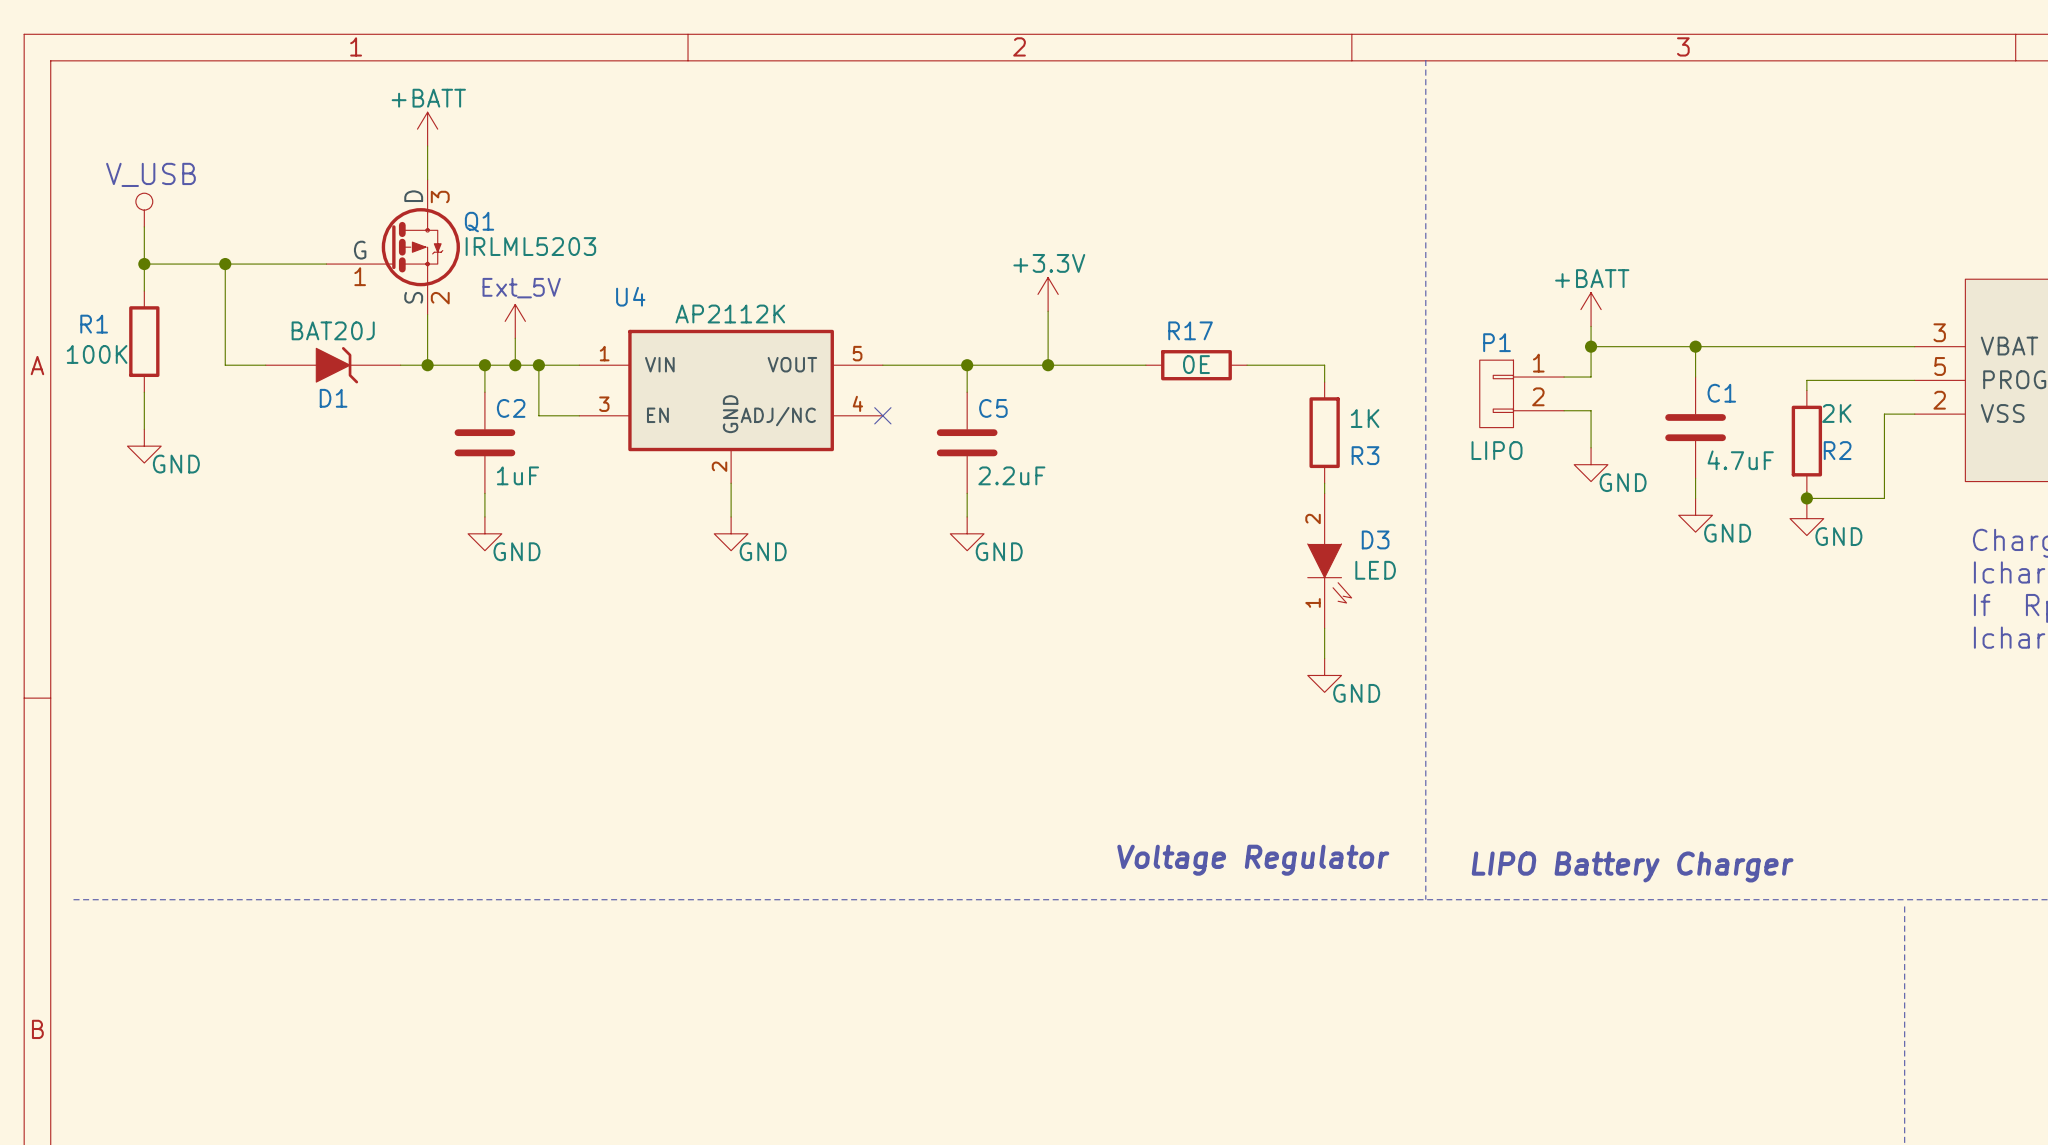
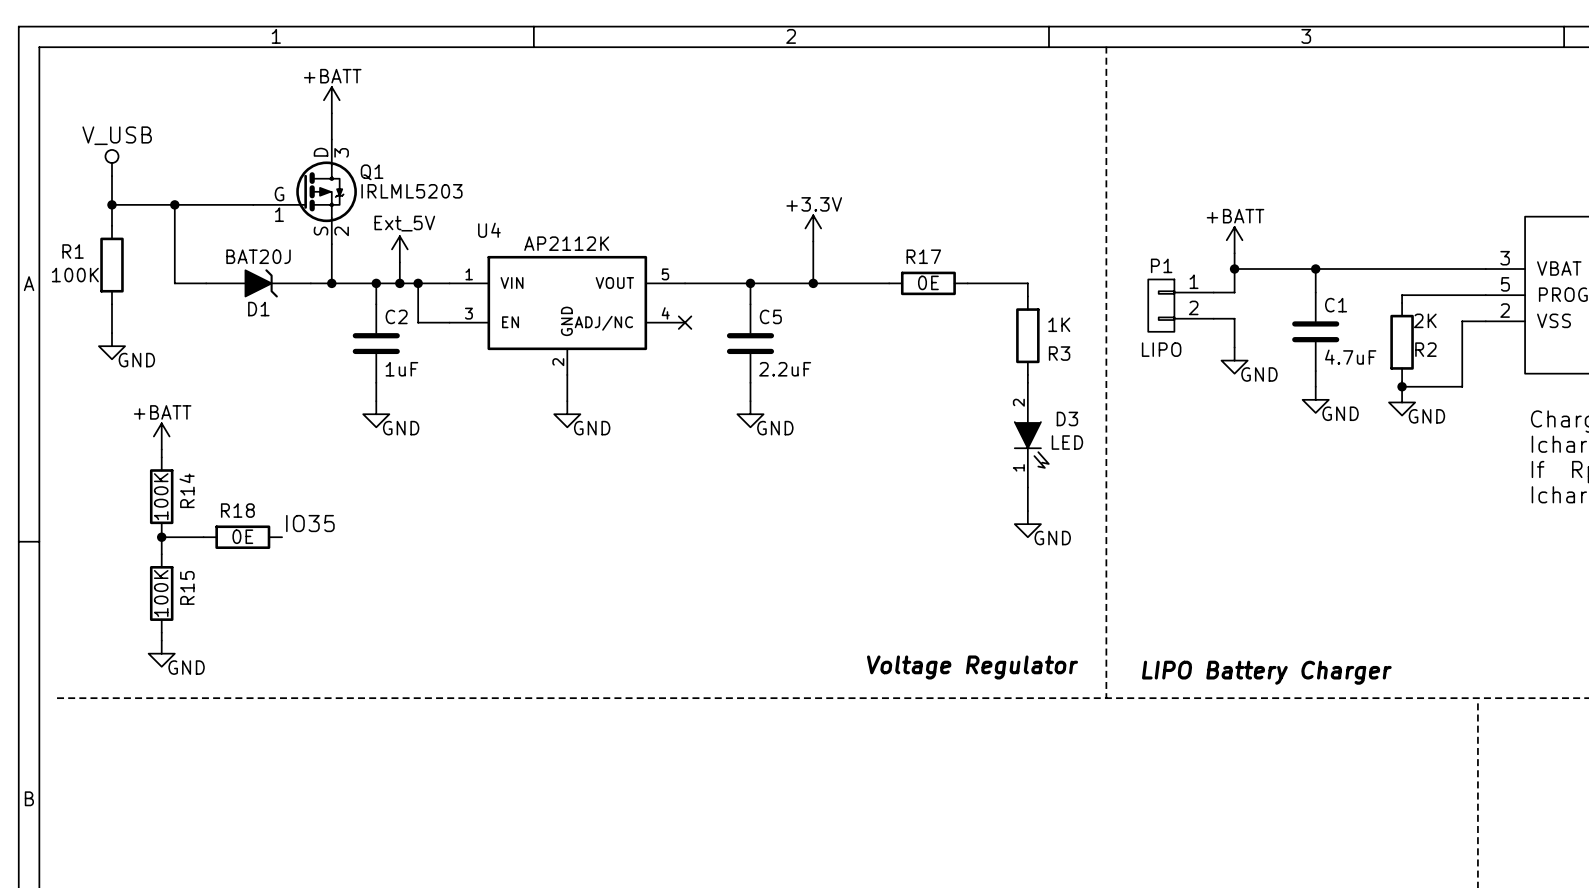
power symbol: none -> +BATT (161, 436)
wire: none -> (161, 449) (161, 457)
R14: none -> 100K (161, 496)
label: none -> IO35 (310, 523)
wire: none -> (161, 535) (161, 554)
wire: none -> (161, 537) (203, 537)
junction: none -> (161, 537)
R18: none -> 0E (242, 537)
R15: none -> 100K (161, 593)
wire: none -> (161, 632) (161, 640)
power symbol: none -> GND (161, 653)

